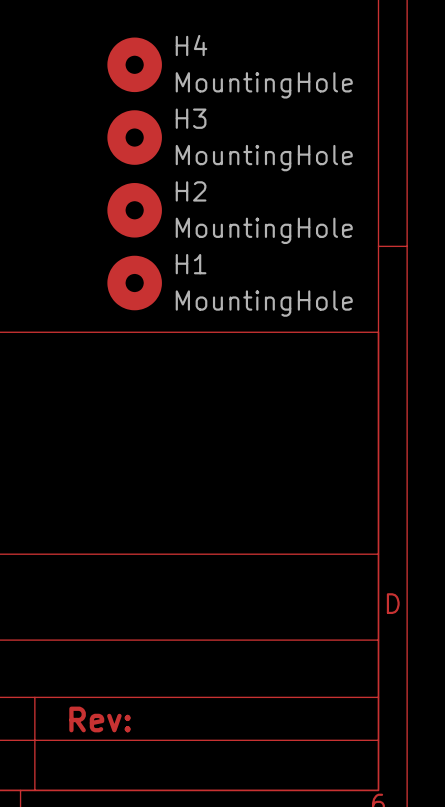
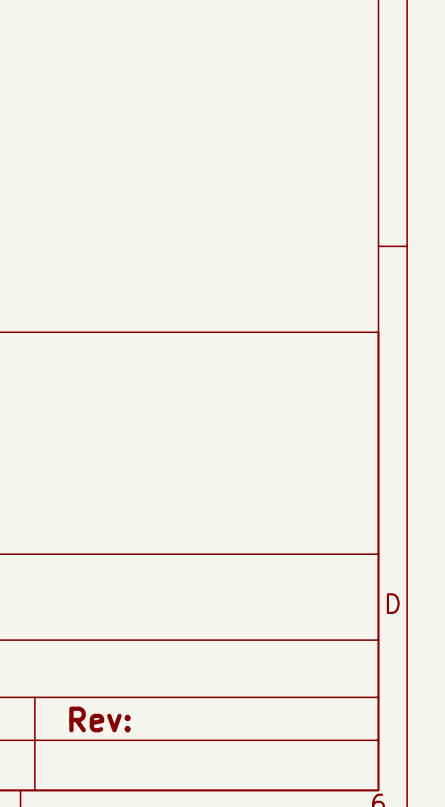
H4: MountingHole (134, 64) -> none
H3: MountingHole (134, 137) -> none
H2: MountingHole (134, 210) -> none
H1: MountingHole (134, 283) -> none

